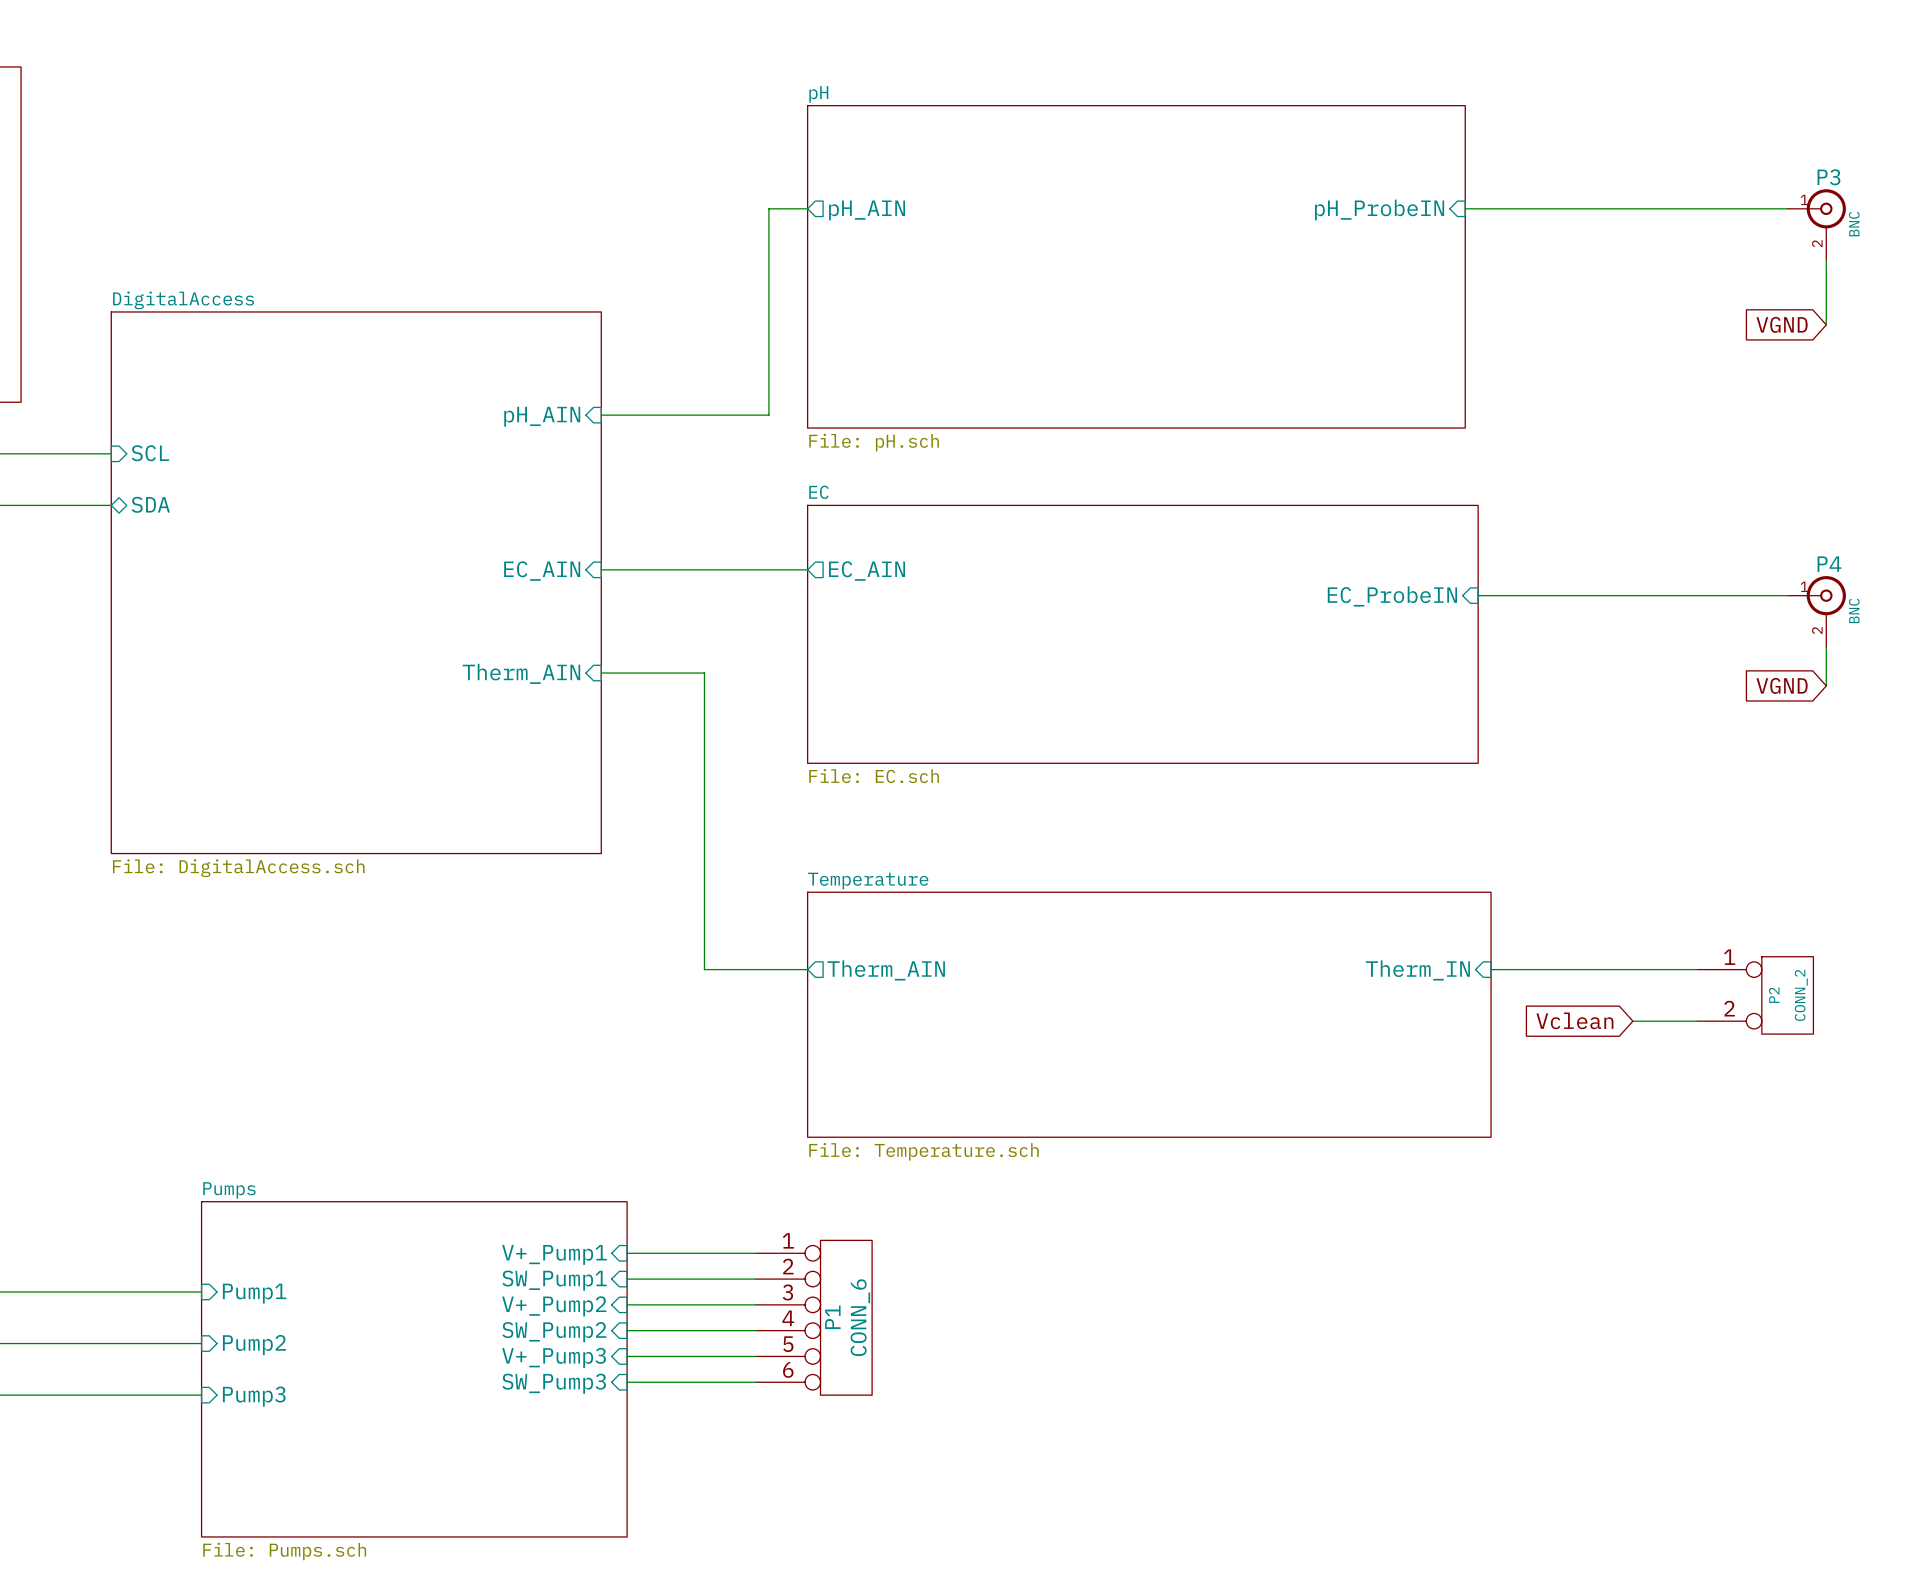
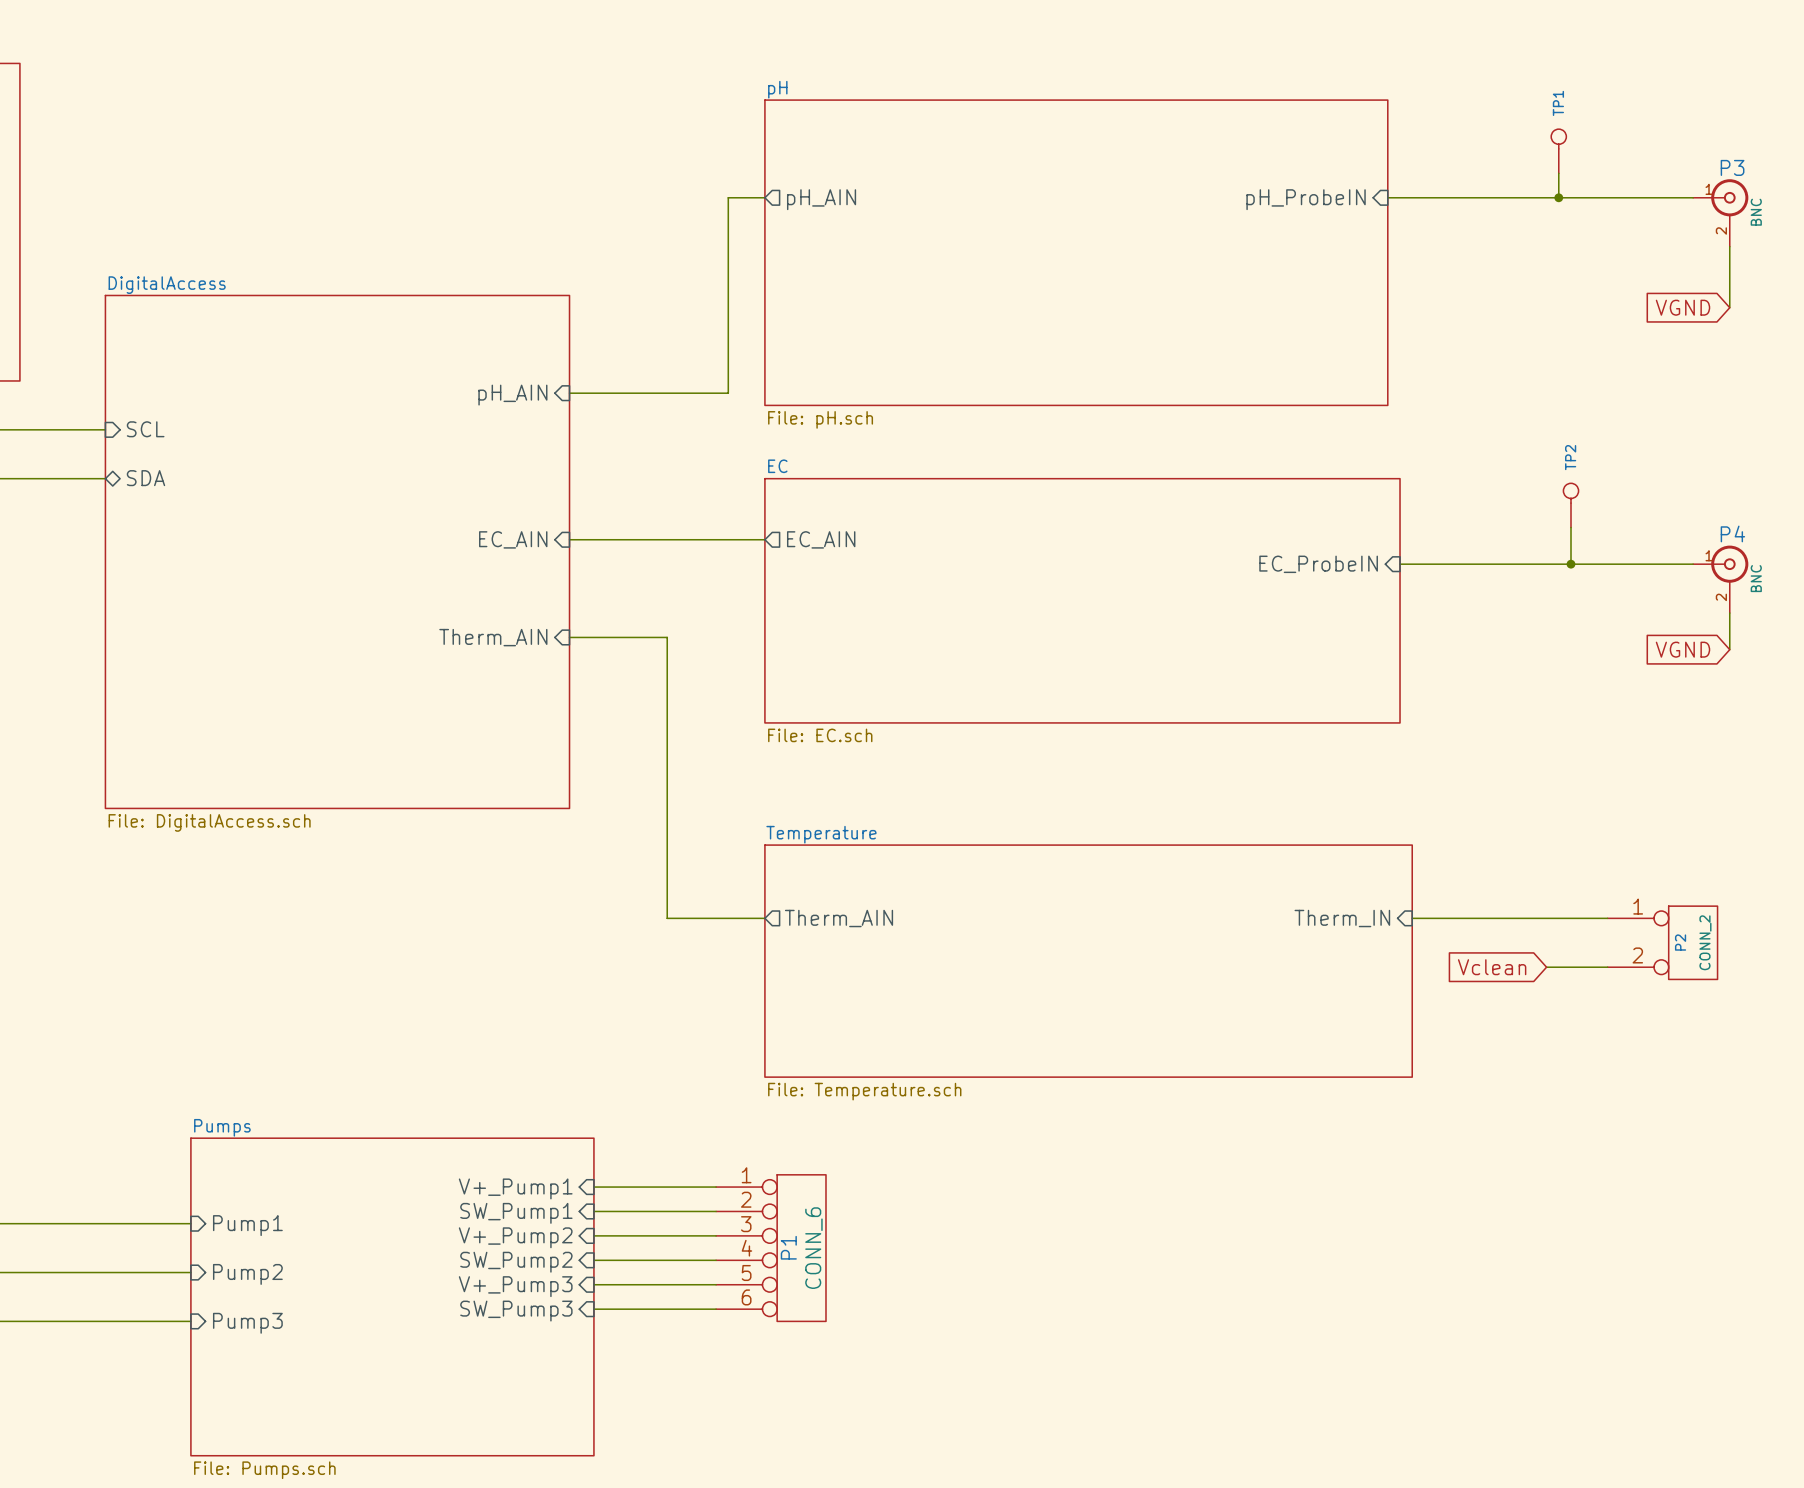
TP1: none -> (1558, 151)
wire: none -> (1558, 173) (1558, 197)
junction: none -> (1558, 197)
TP2: none -> (1570, 505)
wire: none -> (1570, 527) (1570, 564)
junction: none -> (1570, 564)

